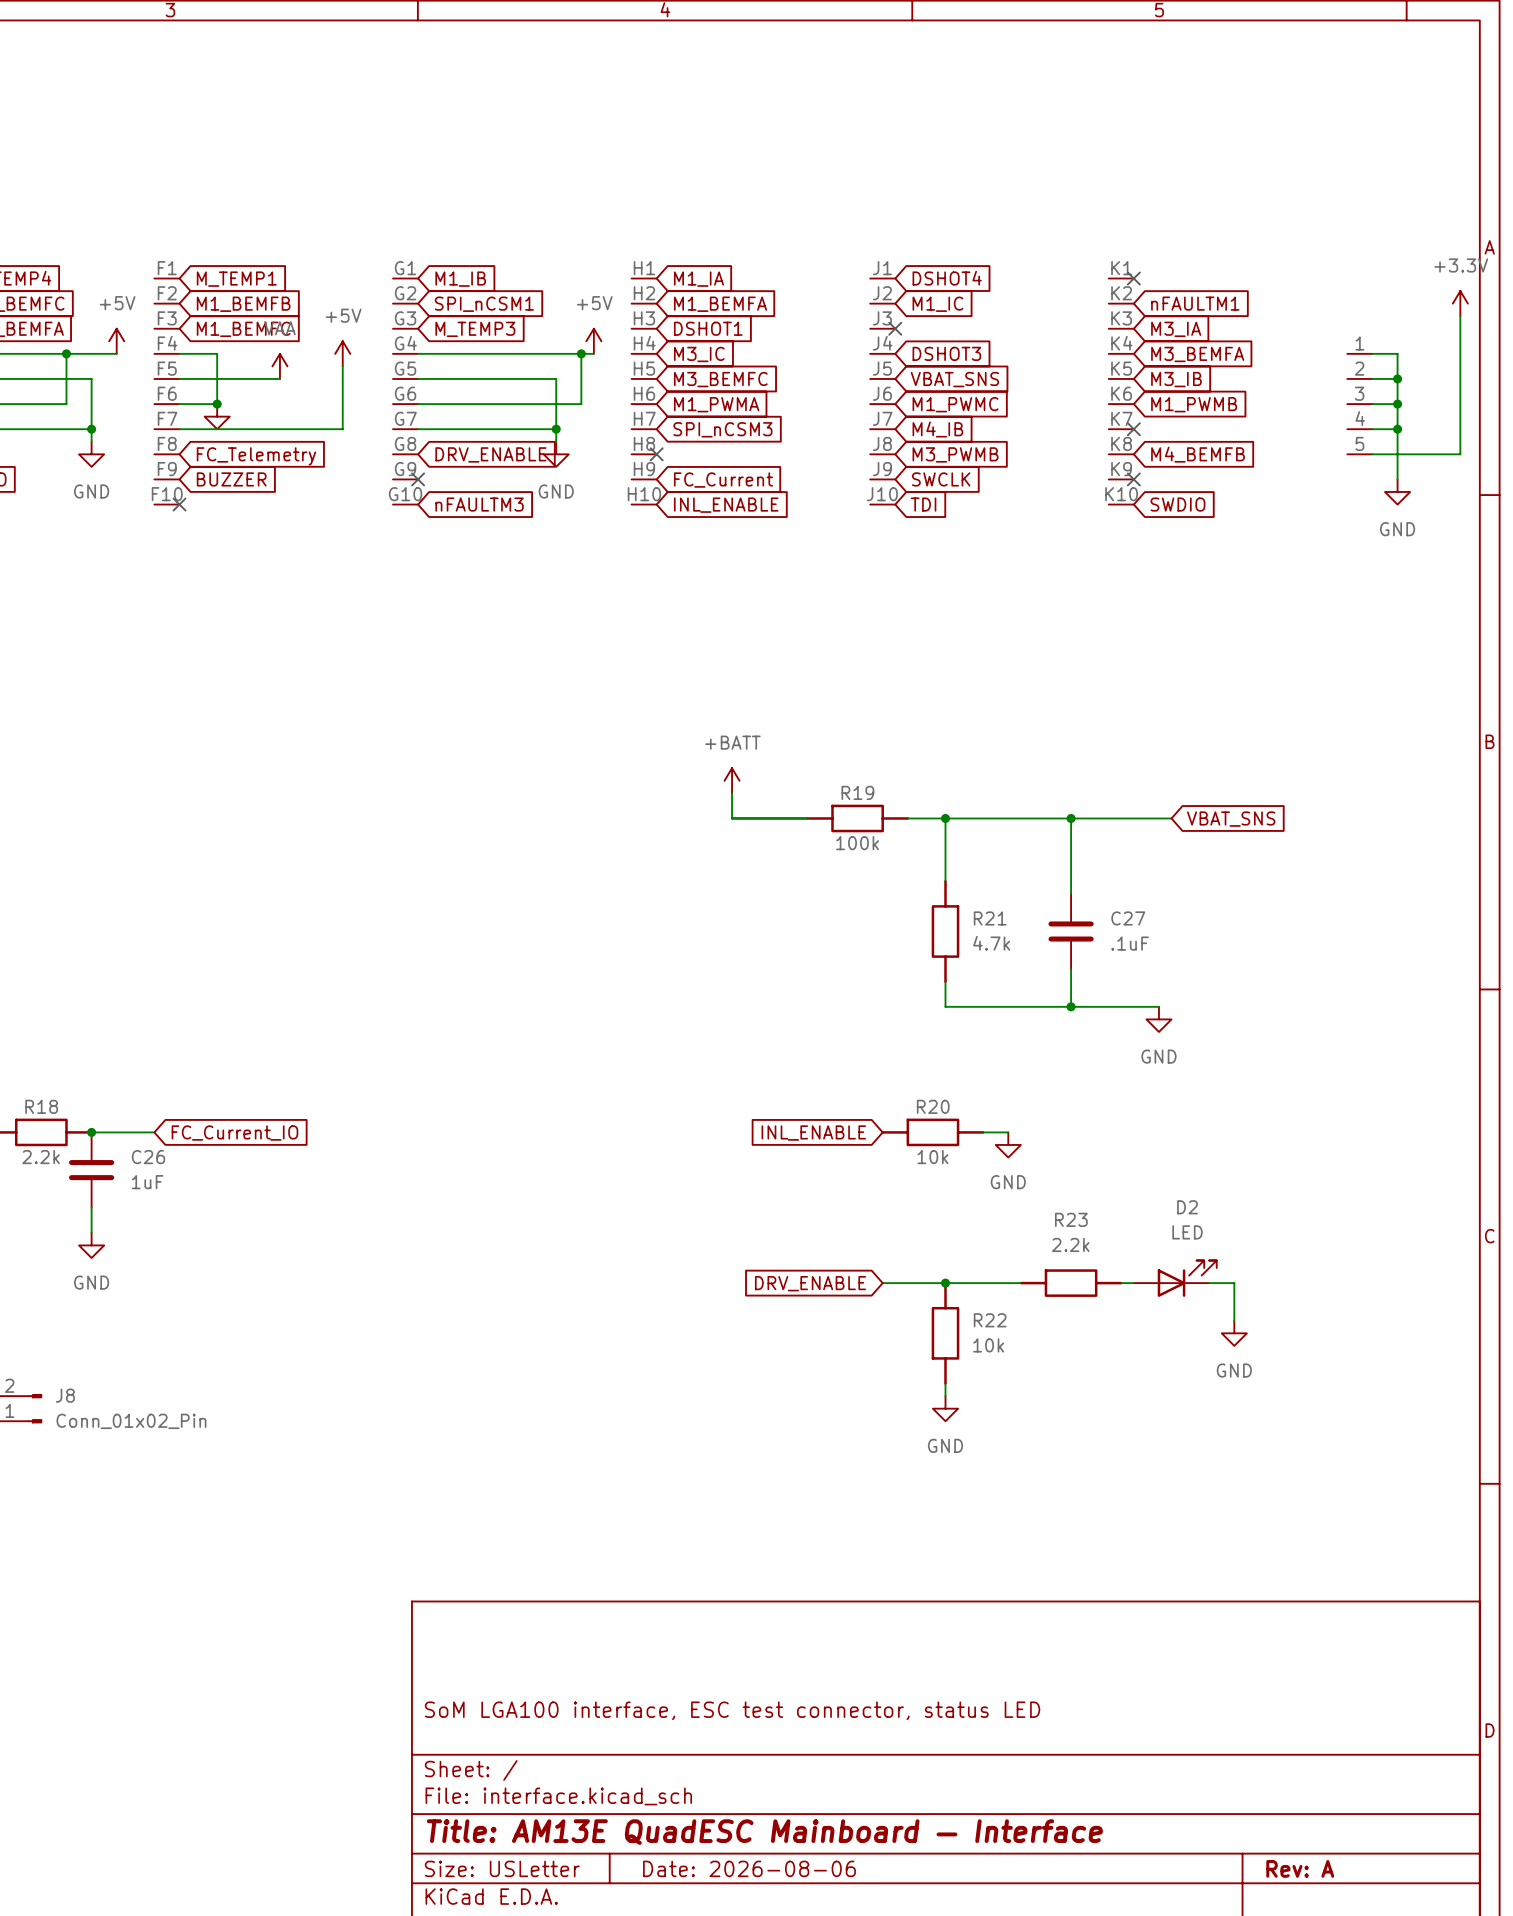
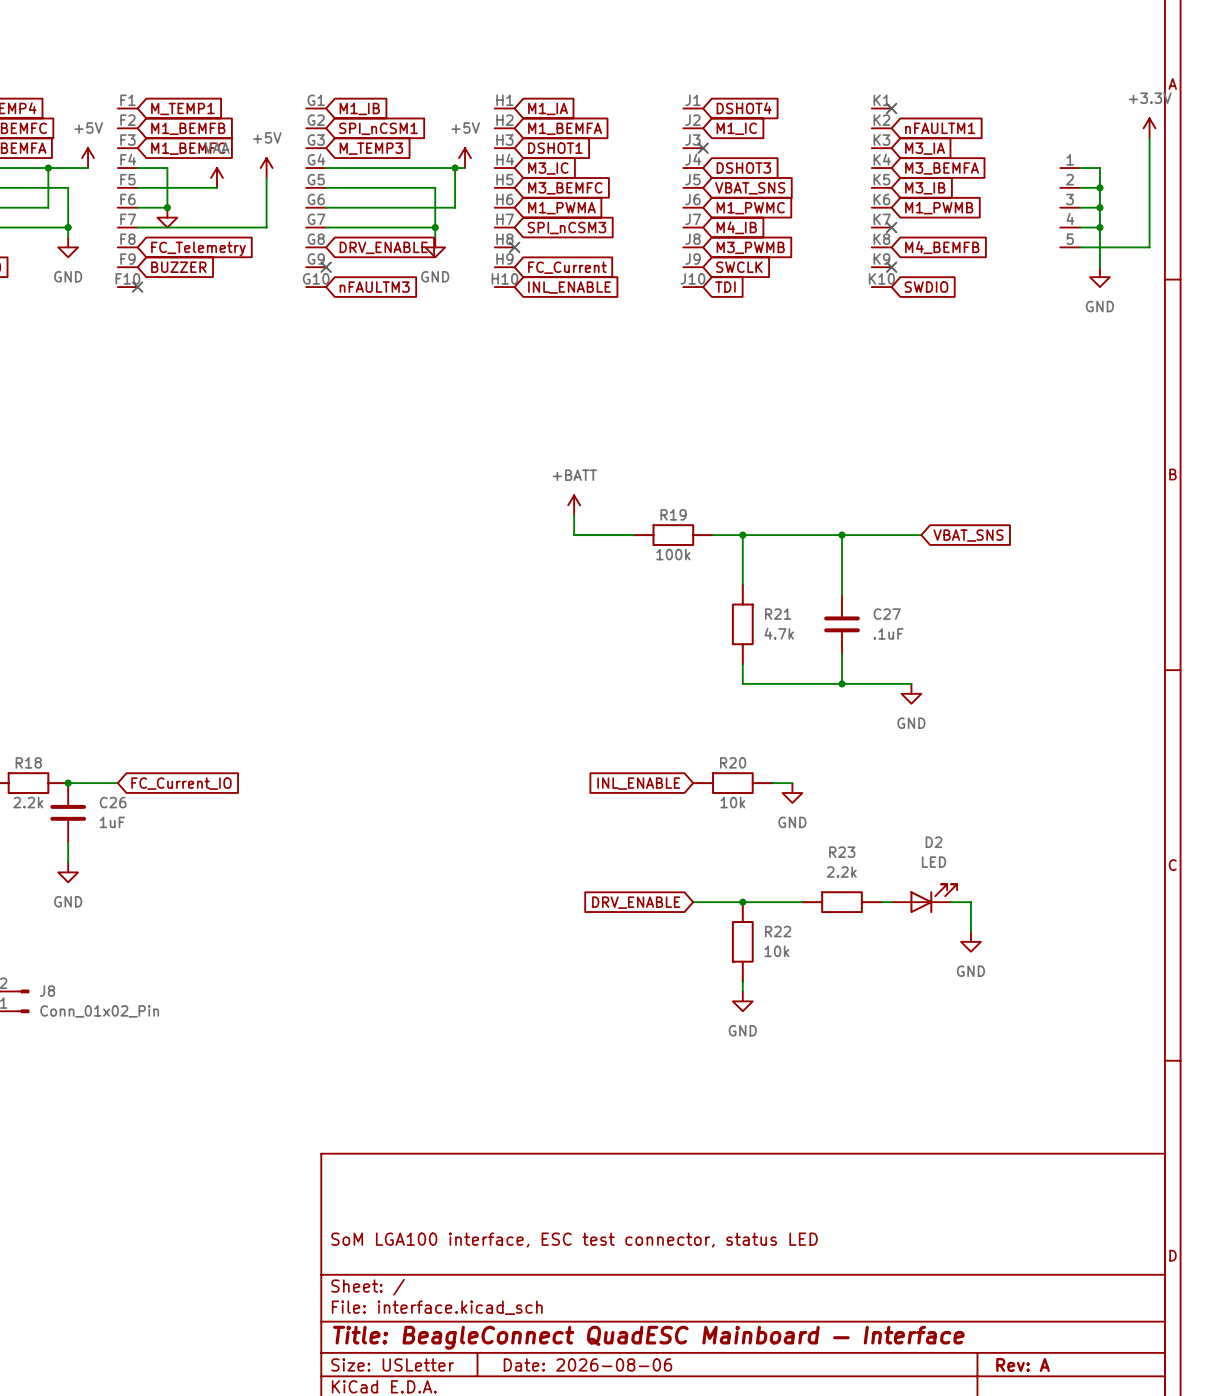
title block: Title: AM13E QuadESC Mainboard — Interface (764, 1832) -> Title: BeagleConnect QuadESC Mainboard — Interface (648, 1337)

